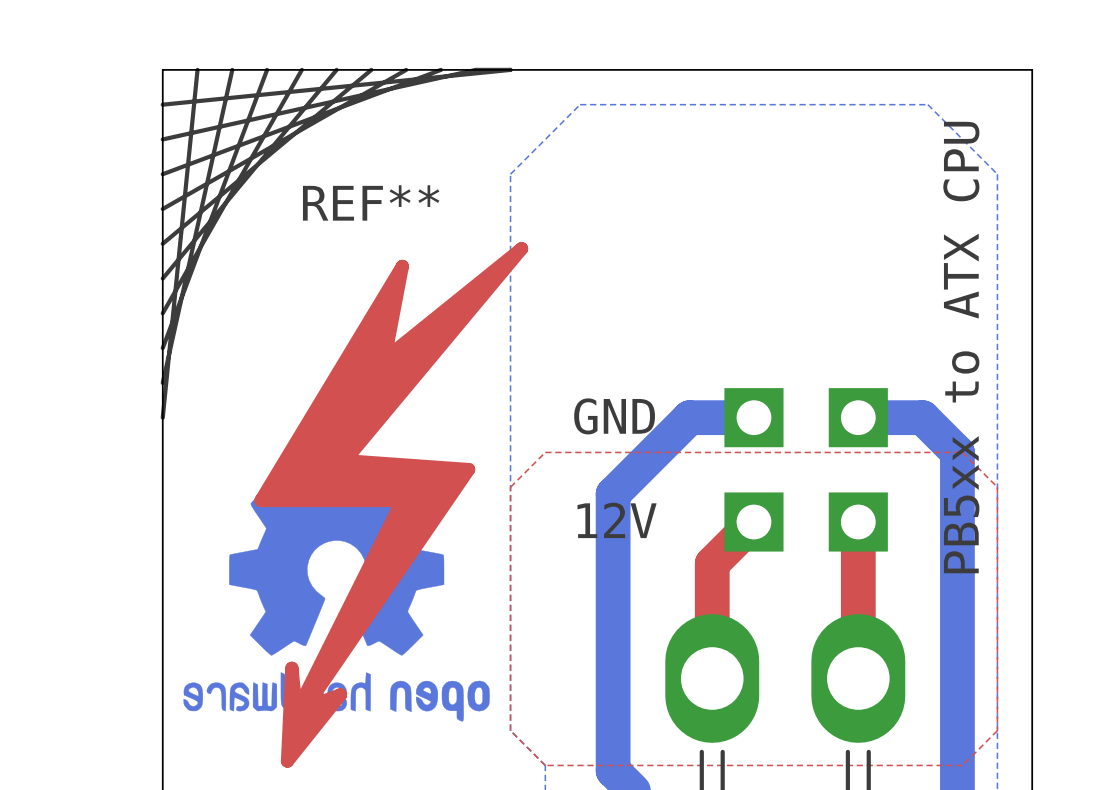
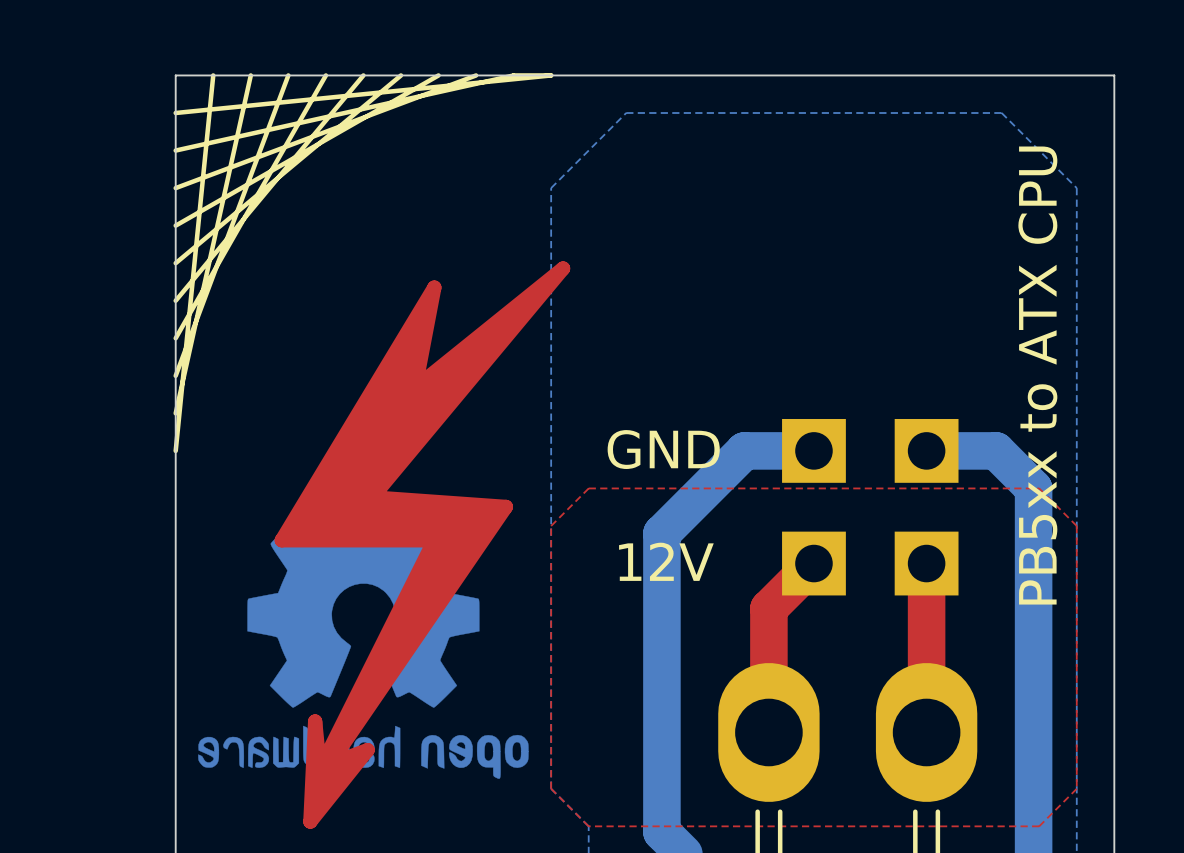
REF**: (391, 504) -> none

